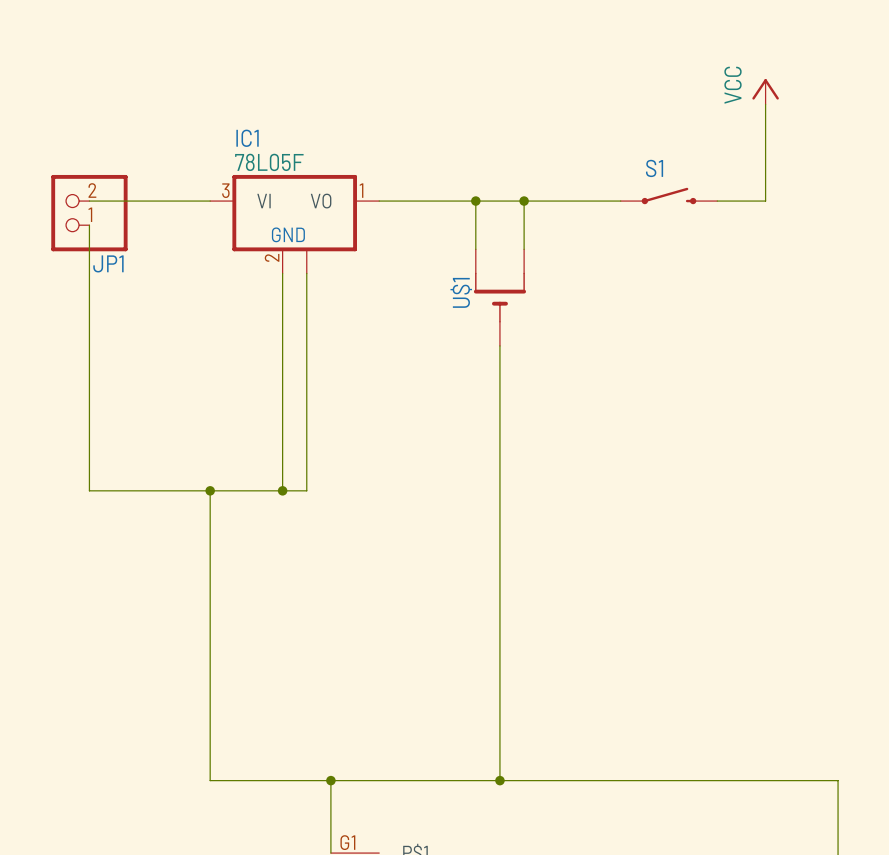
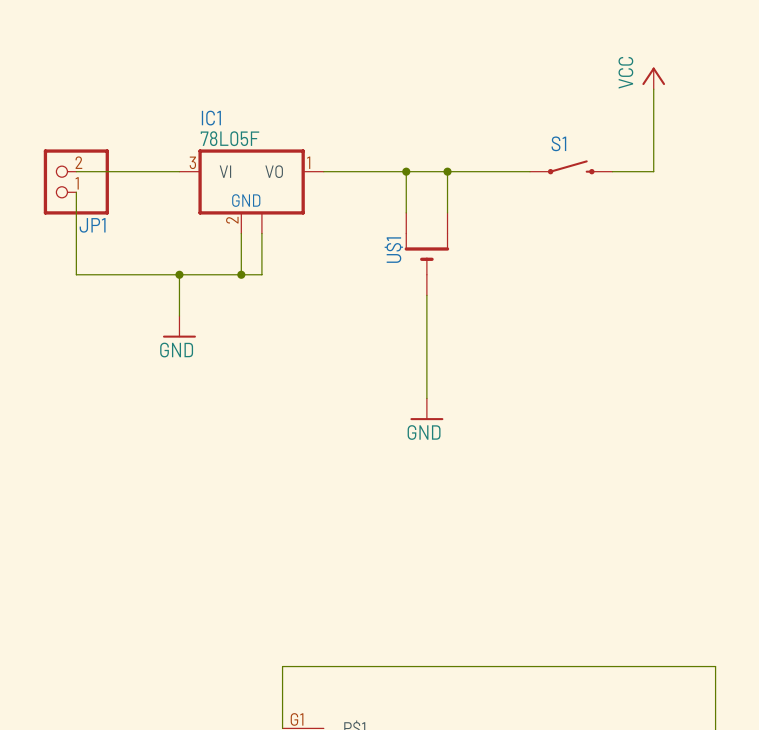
wire: (89, 321) (89, 490) (306, 490) (306, 321) -> (76, 274) (261, 274)
wire: none -> (179, 274) (179, 316)
junction: none -> (179, 274)
wire: (282, 321) (282, 490) -> none
junction: none -> (241, 274)
power symbol: none -> GND (179, 326)
wire: (499, 466) (499, 780) -> none
power symbol: none -> GND (426, 409)
wire: (210, 490) (210, 780) (330, 780) -> none
junction: (210, 490) -> none
junction: (282, 490) -> none
junction: (330, 780) -> none
junction: (499, 780) -> none

